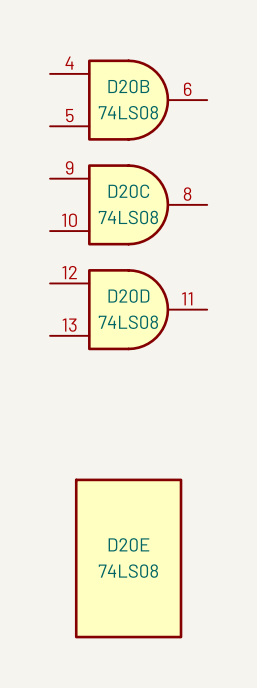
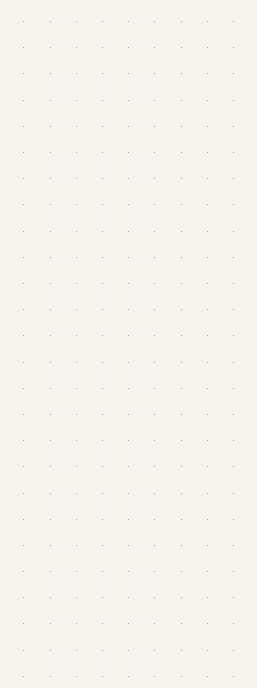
D20B: 74LS08 (128, 100) -> none
D20C: 74LS08 (128, 204) -> none
D20D: 74LS08 (128, 309) -> none
D20E: 74LS08 (128, 558) -> none

